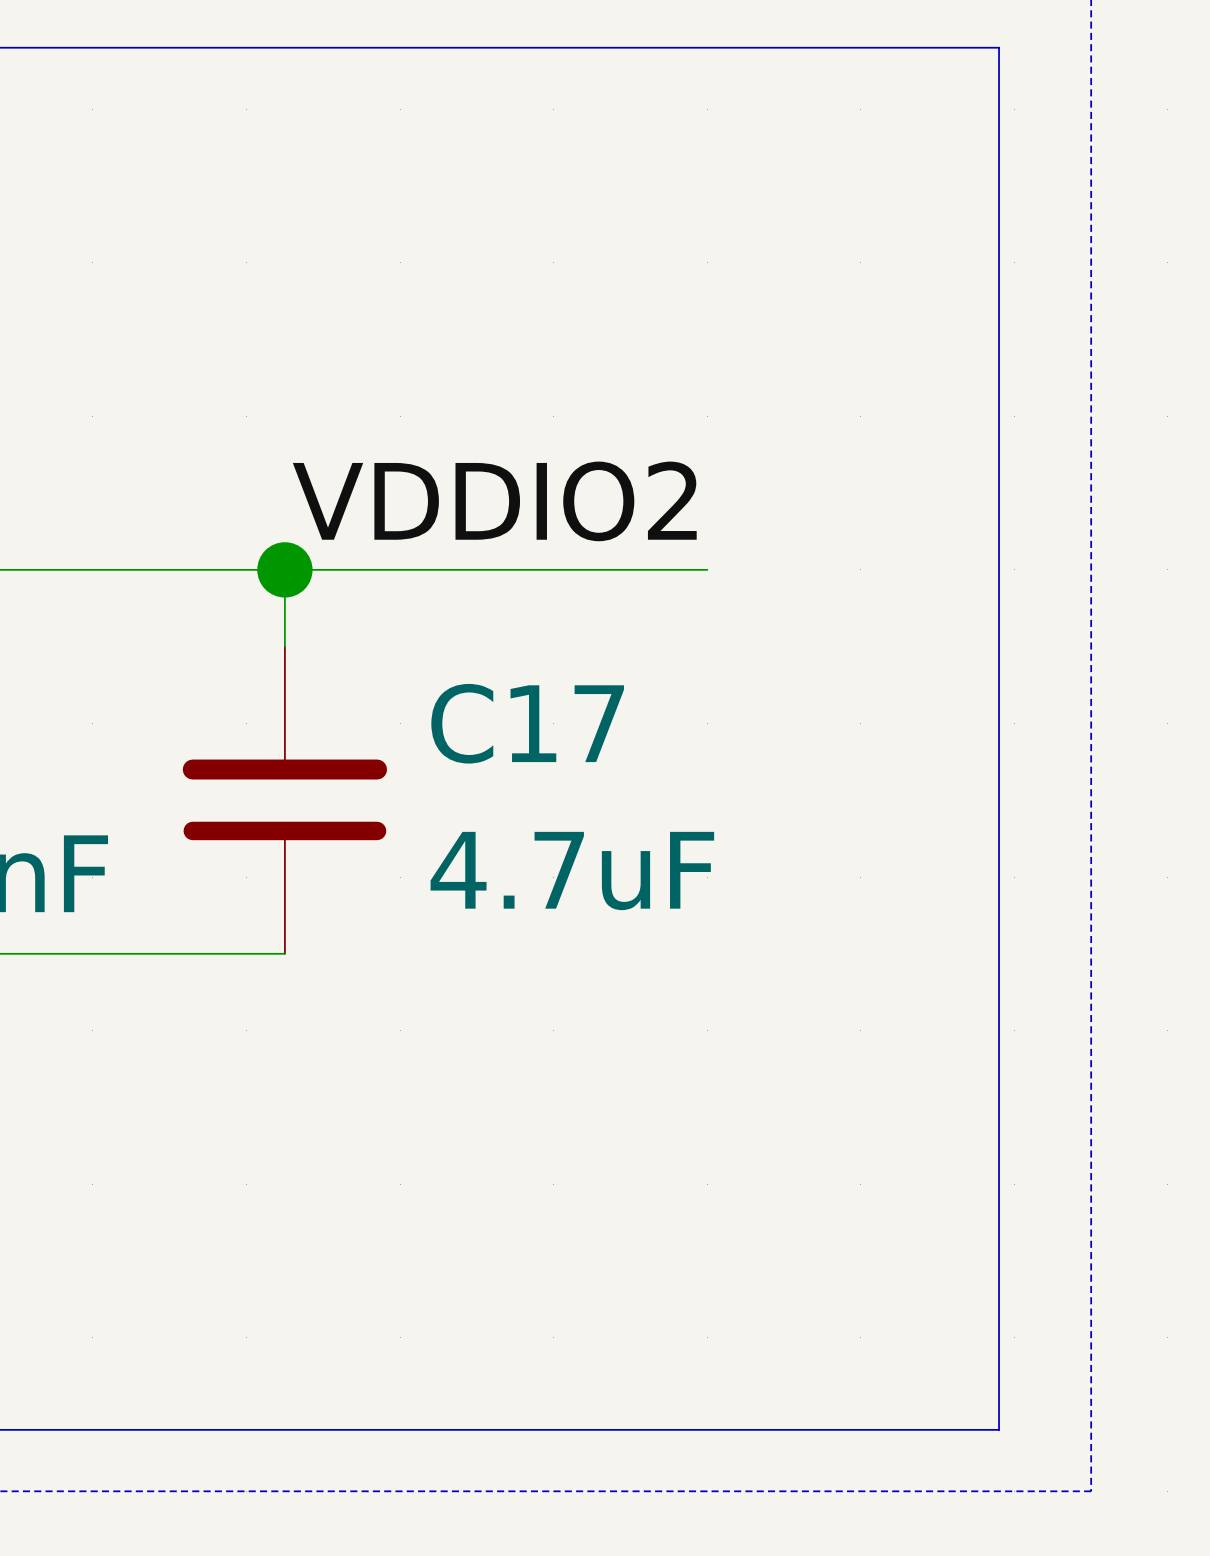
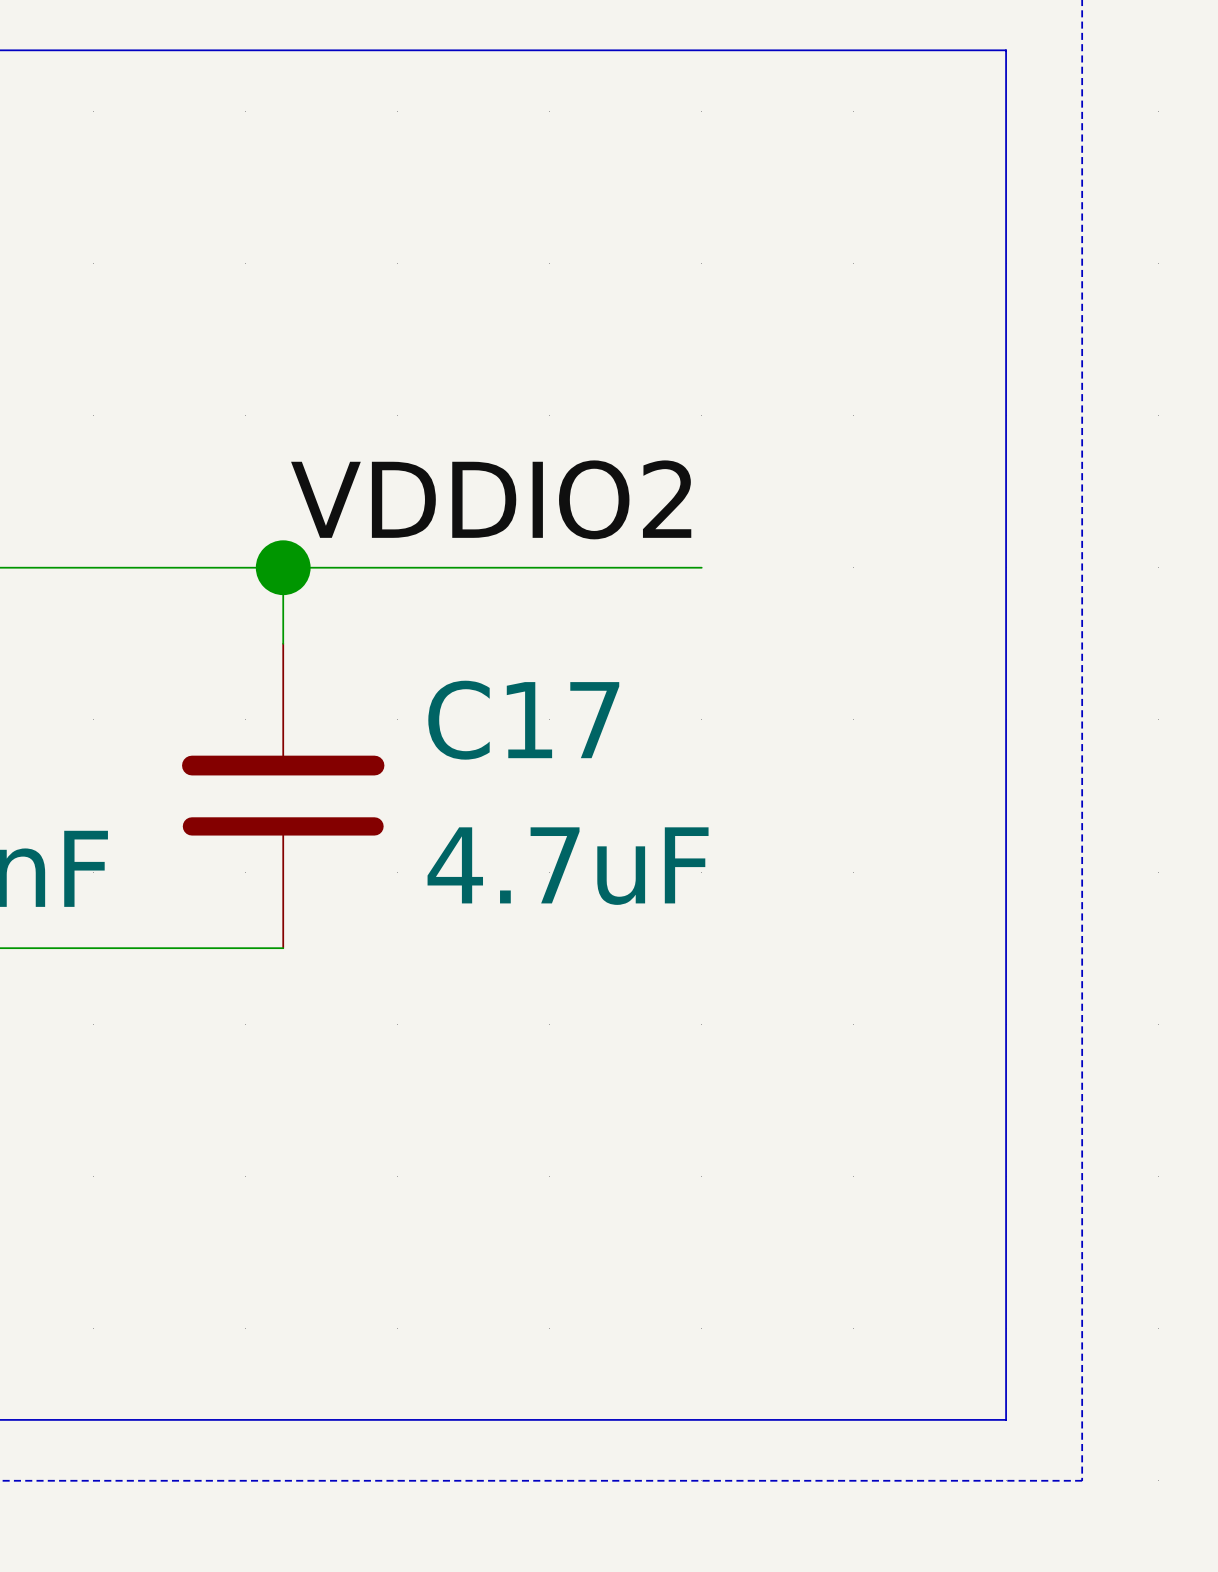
line: (999, 47) (999, 1429) -> (990, 50) (1006, 50) (1006, 1419) (990, 1419)

